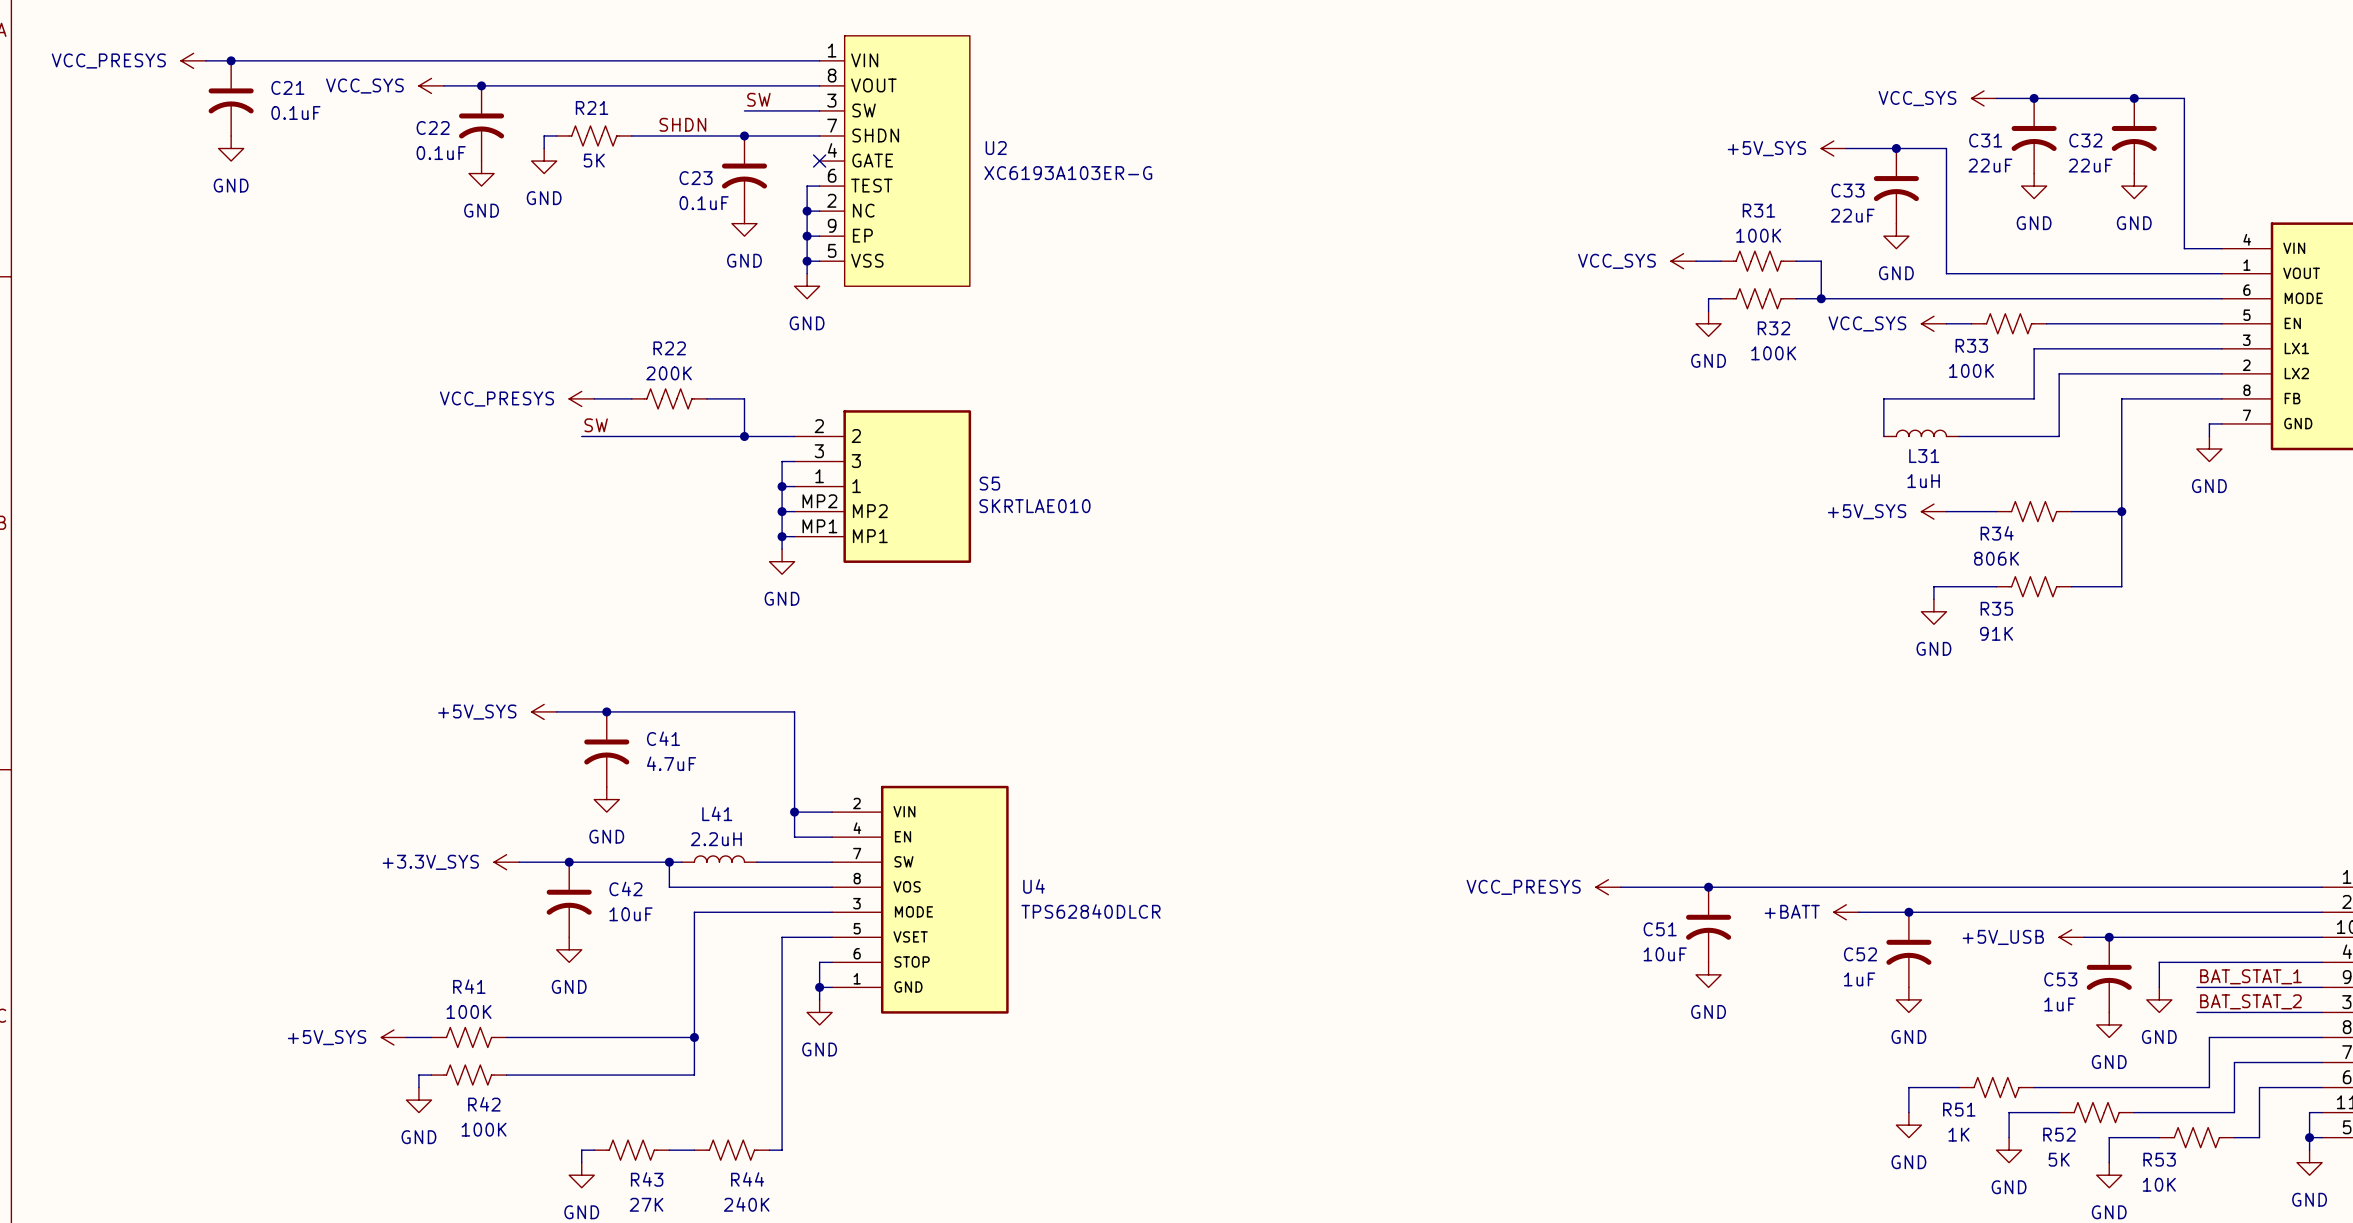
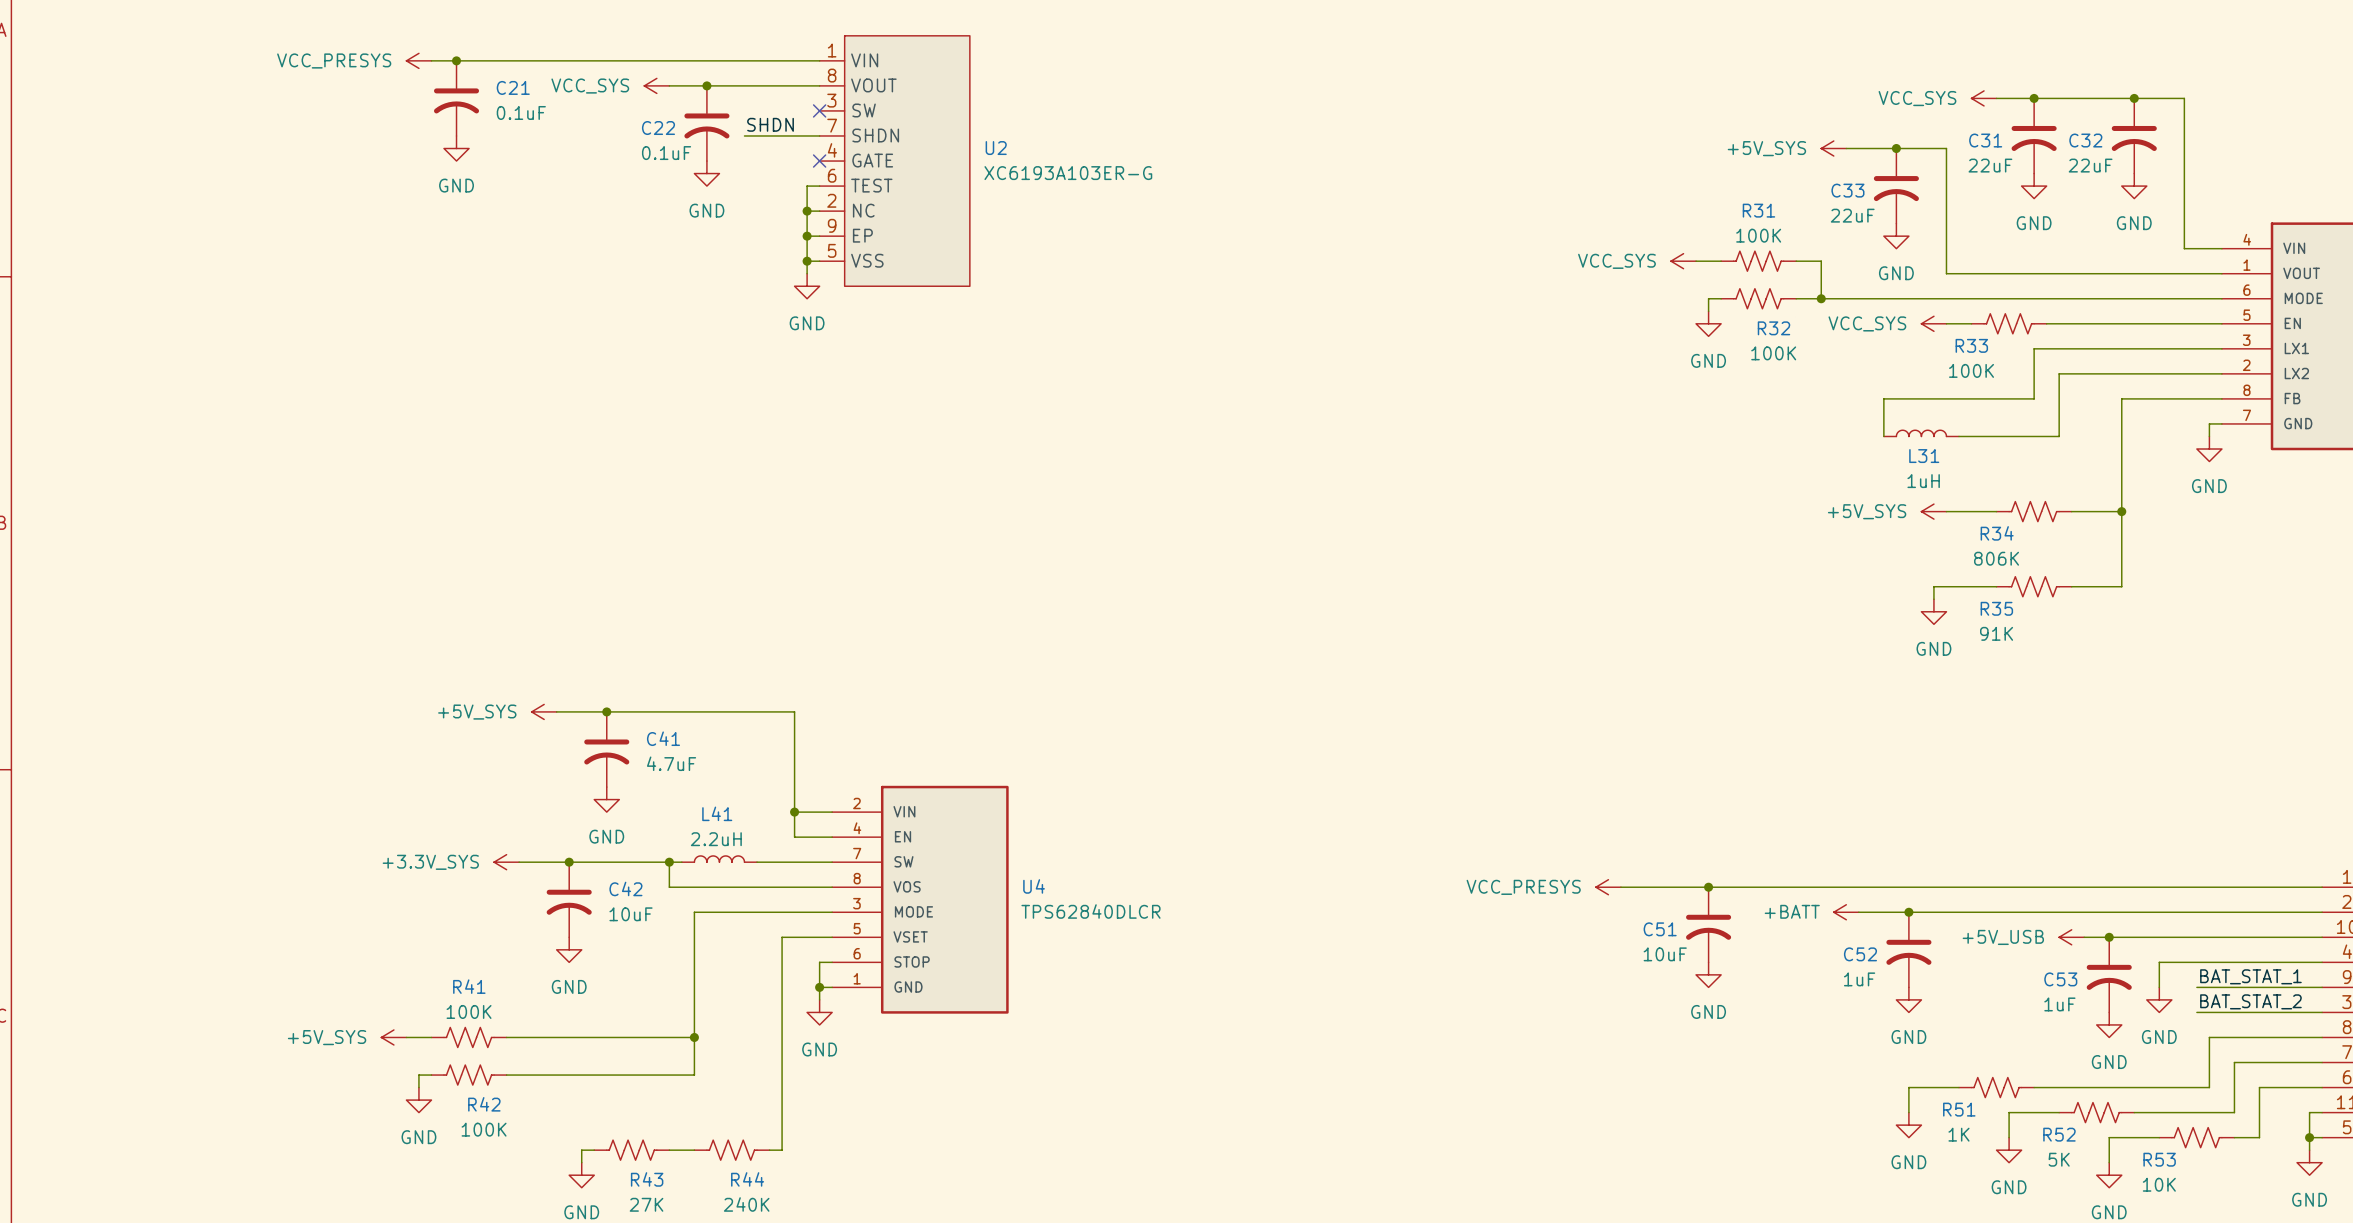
power symbol: VCC_PRESYS (193, 60) -> none
wire: (206, 60) (431, 60) -> none
junction: (231, 60) -> none
power symbol: none -> VCC_PRESYS (418, 60)
power symbol position: VCC_SYS (431, 85) -> VCC_SYS (656, 85)
wire: (444, 85) (669, 85) -> none
junction position: (481, 85) -> (456, 60)
junction: none -> (706, 85)
C21 position: (231, 98) -> (456, 98)
label: SW (758, 99) -> none
wire: (744, 110) (819, 110) -> none
no-connect mark: none -> (819, 110)
C22 position: (481, 123) -> (706, 123)
label position: SHDN (682, 124) -> SHDN (770, 124)
wire: (556, 135) (544, 135) (544, 148) -> none
R21: 5K (594, 135) -> none
wire: (631, 135) (744, 135) -> none
junction: (744, 135) -> none
power symbol: GND (231, 148) -> none
power symbol: GND (544, 161) -> none
power symbol position: GND (481, 173) -> GND (456, 148)
C23: 0.1uF (744, 173) -> none
power symbol position: GND (744, 223) -> GND (706, 173)
power symbol: VCC_PRESYS (581, 398) -> none
wire: (594, 398) (631, 398) -> none
R22: 200K (669, 398) -> none
wire: (706, 398) (744, 398) (744, 436) -> none
label: SW (596, 425) -> none
wire: (581, 436) (794, 436) -> none
junction: (744, 436) -> none
wire: (794, 461) (782, 461) (782, 549) -> none
wire: (782, 486) (794, 486) -> none
junction: (782, 486) -> none
S5: SKRTLAE010 (882, 486) -> none
wire: (782, 511) (794, 511) -> none
junction: (782, 511) -> none
wire: (782, 536) (794, 536) -> none
junction: (782, 536) -> none
power symbol: GND (782, 561) -> none

